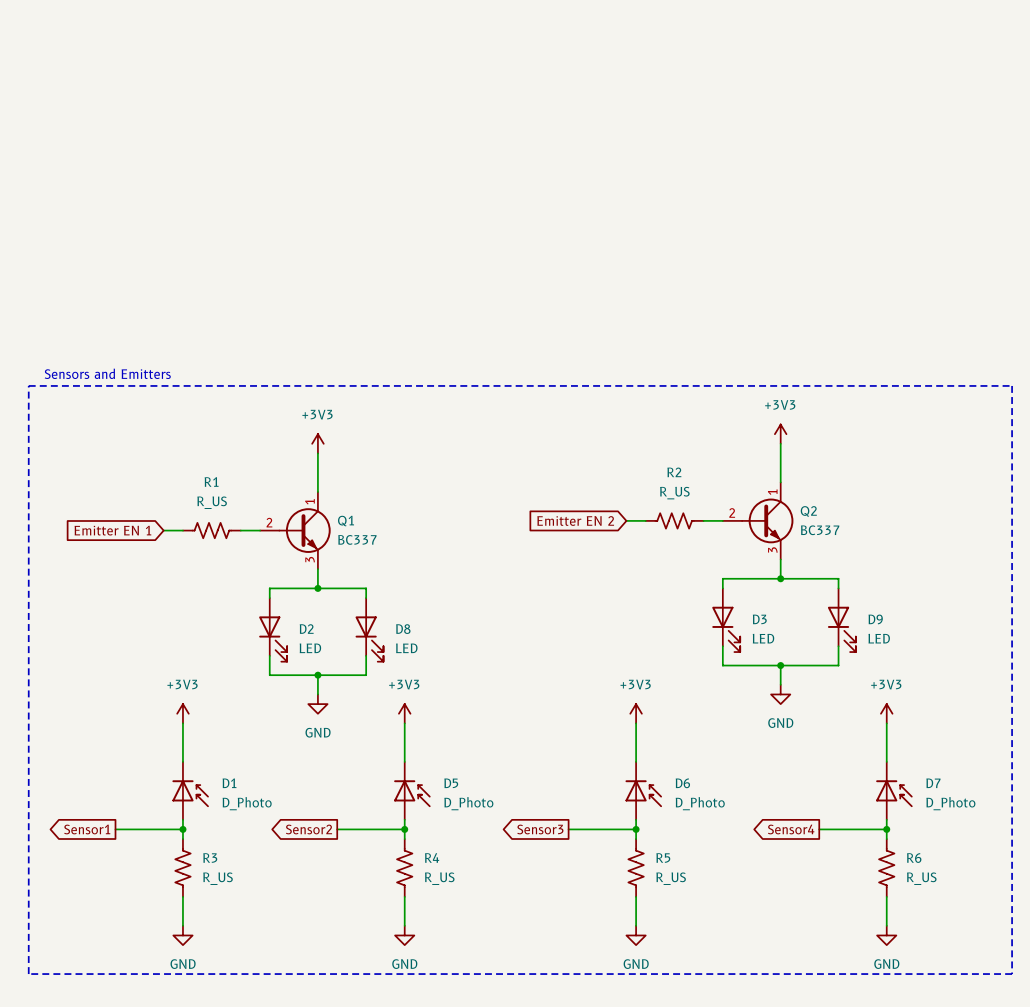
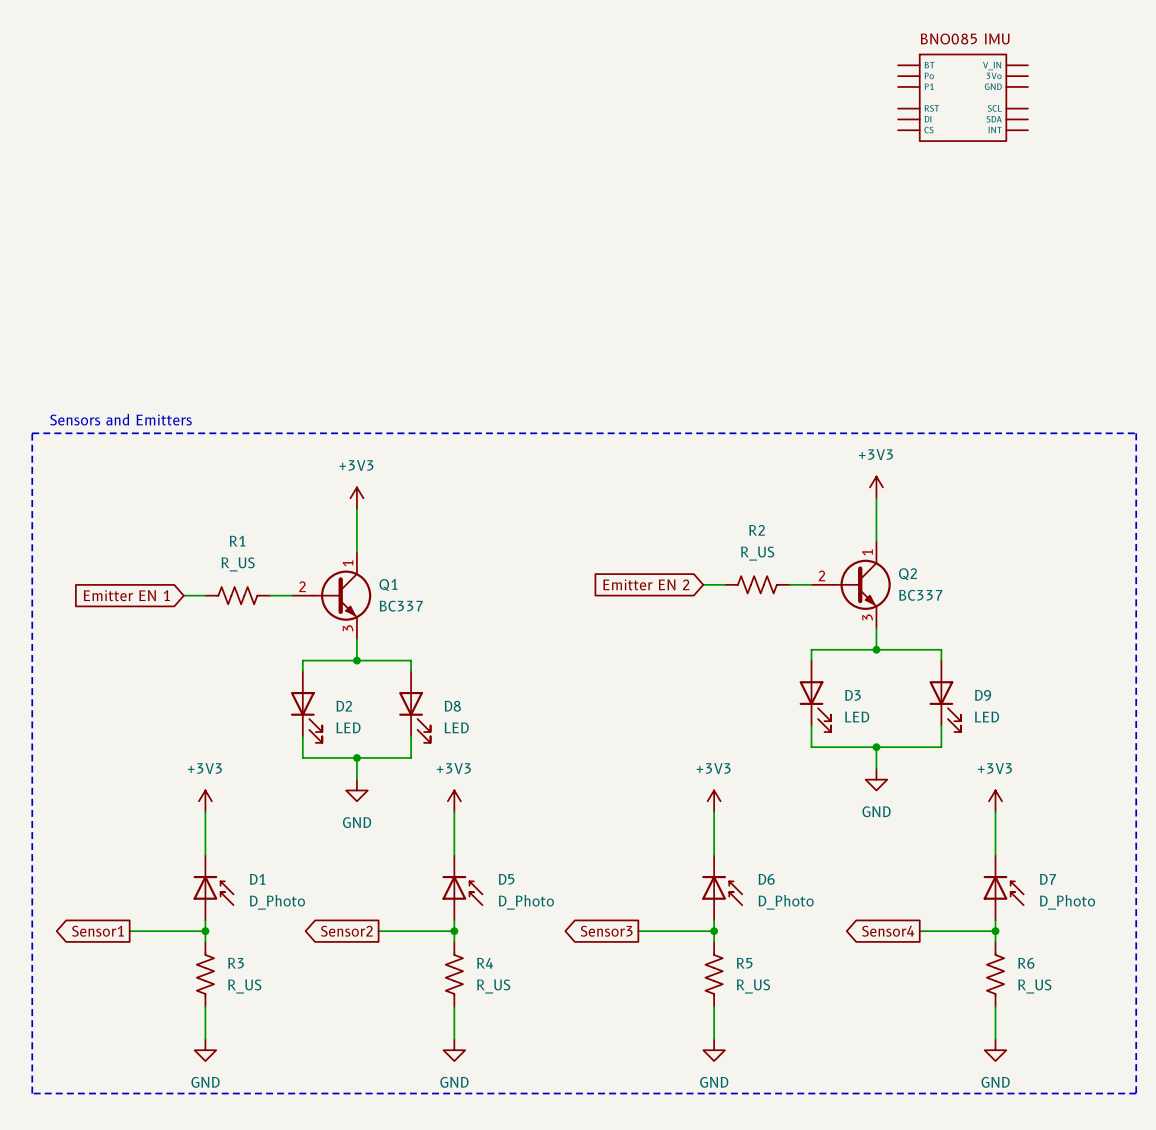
part: none -> (963, 97)

